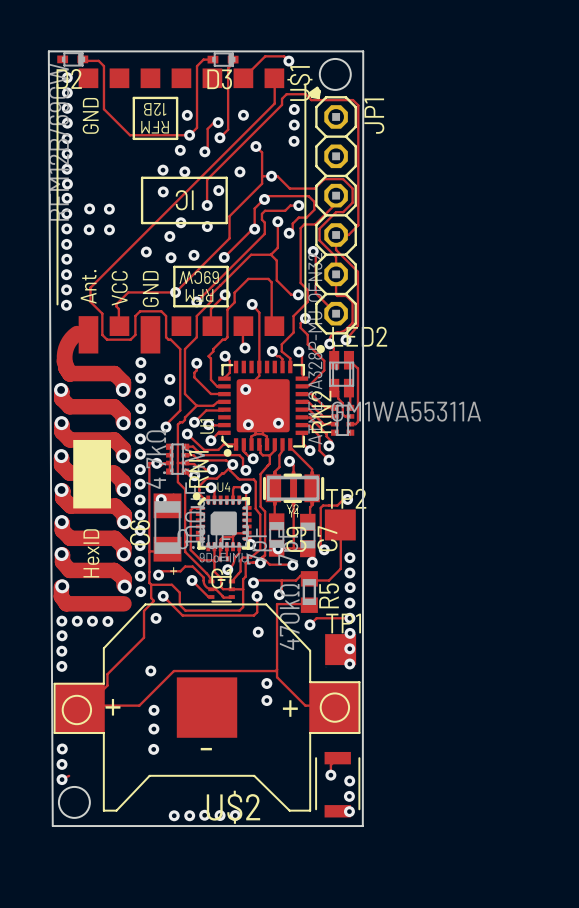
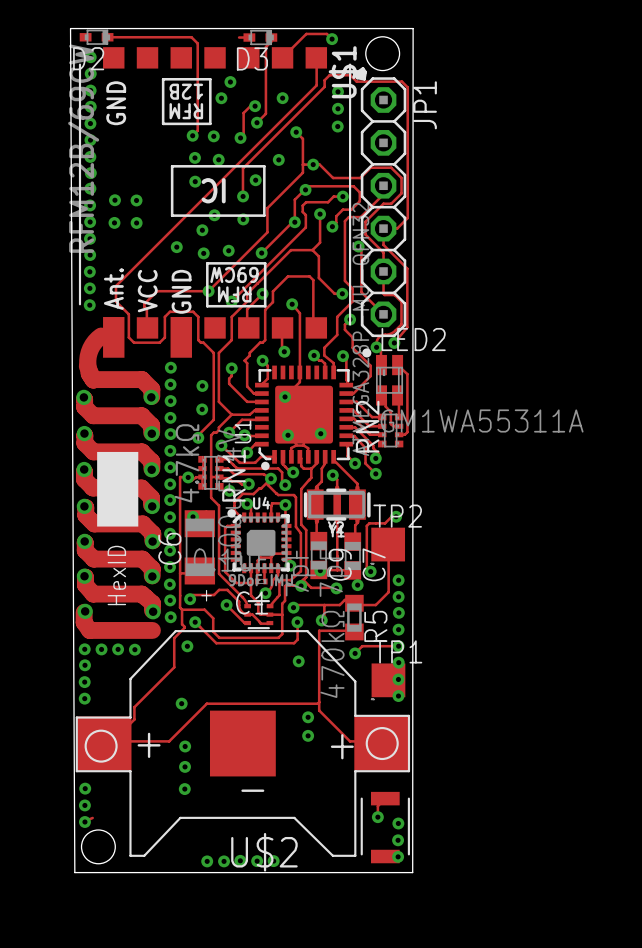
track: (82, 59) (98, 60) (103, 66) (103, 109) (130, 135) (189, 135) (197, 127) (197, 66) (203, 59) -> (107, 37) (191, 37) (197, 43) (197, 130) (192, 135)
via: none -> (230, 82)
via: (189, 135) -> none
via: none -> (192, 135)

